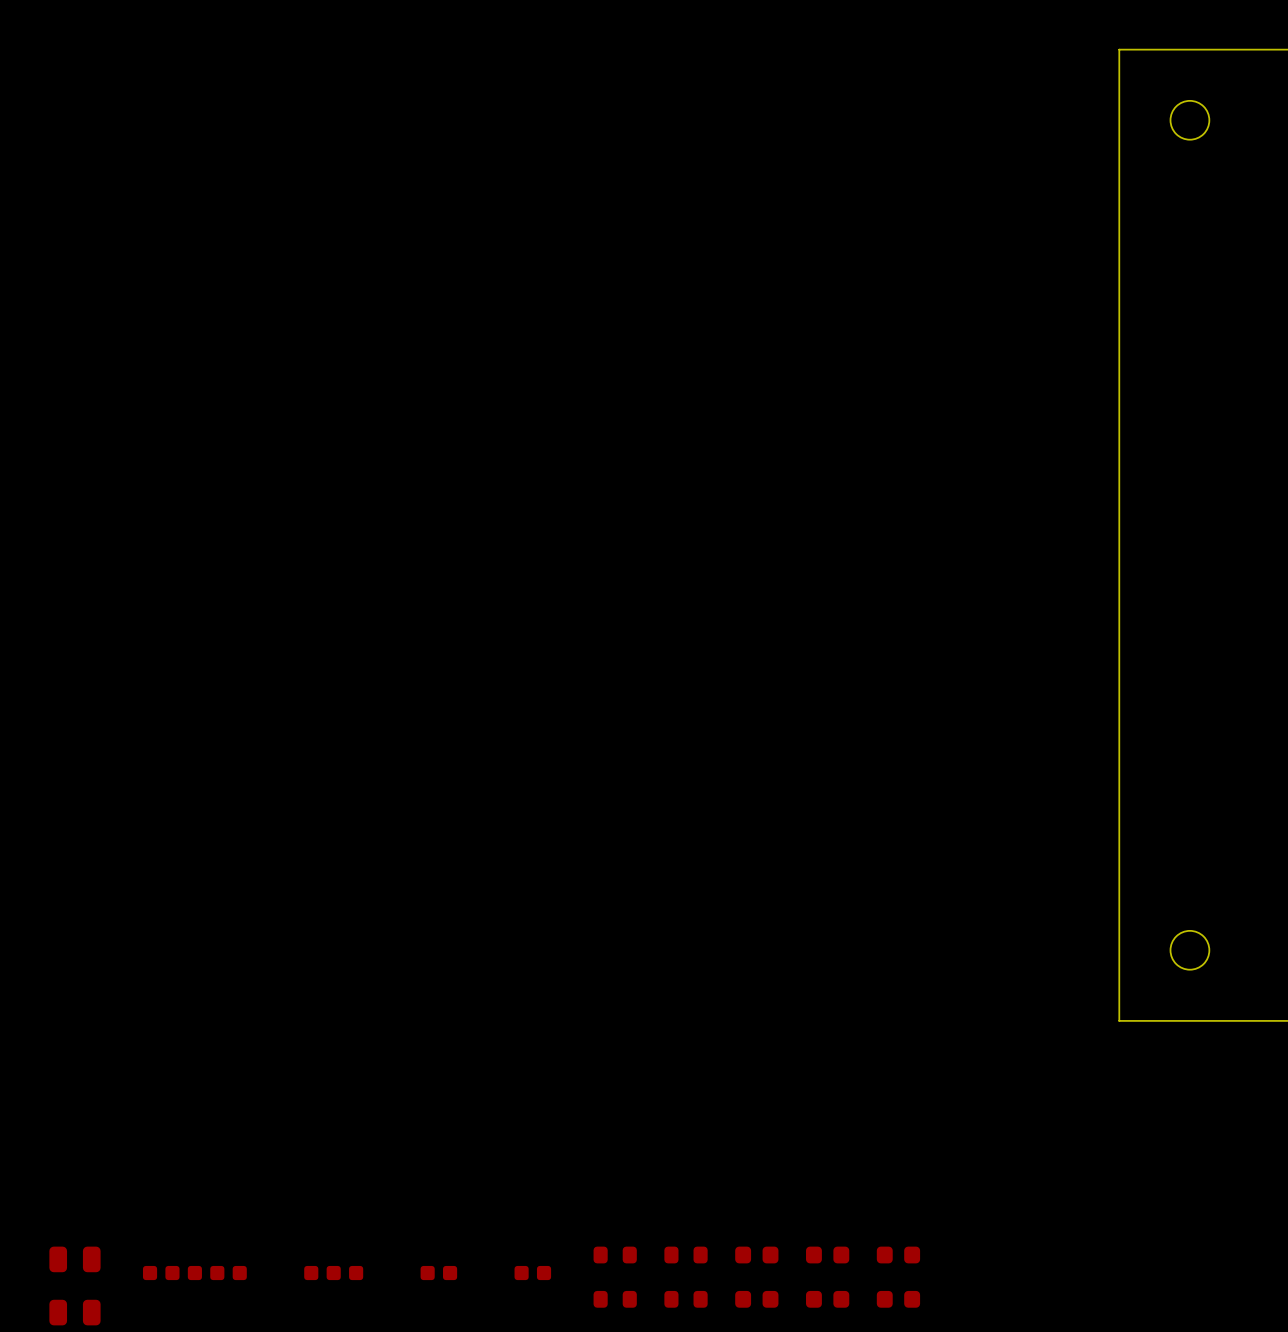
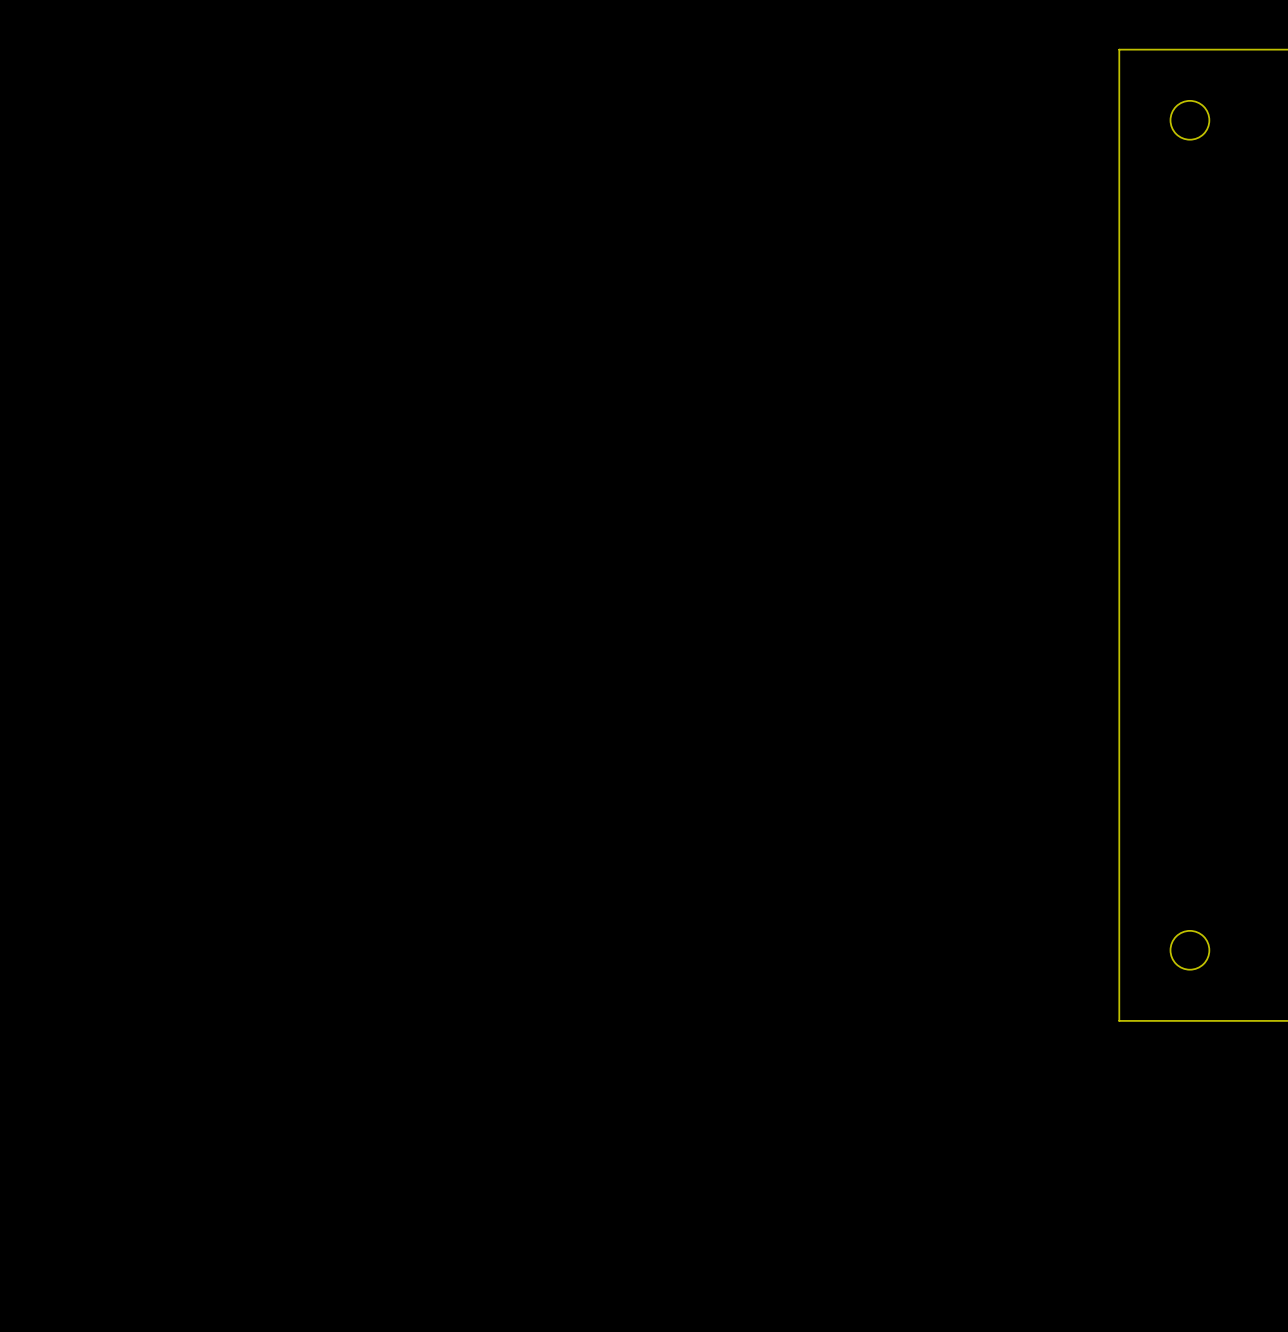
part: (615, 1255) -> none
part: (686, 1255) -> none
part: (756, 1255) -> none
part: (827, 1255) -> none
part: (898, 1255) -> none
part: (74, 1259) -> none
part: (194, 1273) -> none
part: (333, 1273) -> none
part: (438, 1273) -> none
part: (532, 1273) -> none
part: (615, 1299) -> none
part: (686, 1299) -> none
part: (756, 1299) -> none
part: (827, 1299) -> none
part: (898, 1299) -> none
part: (74, 1312) -> none

